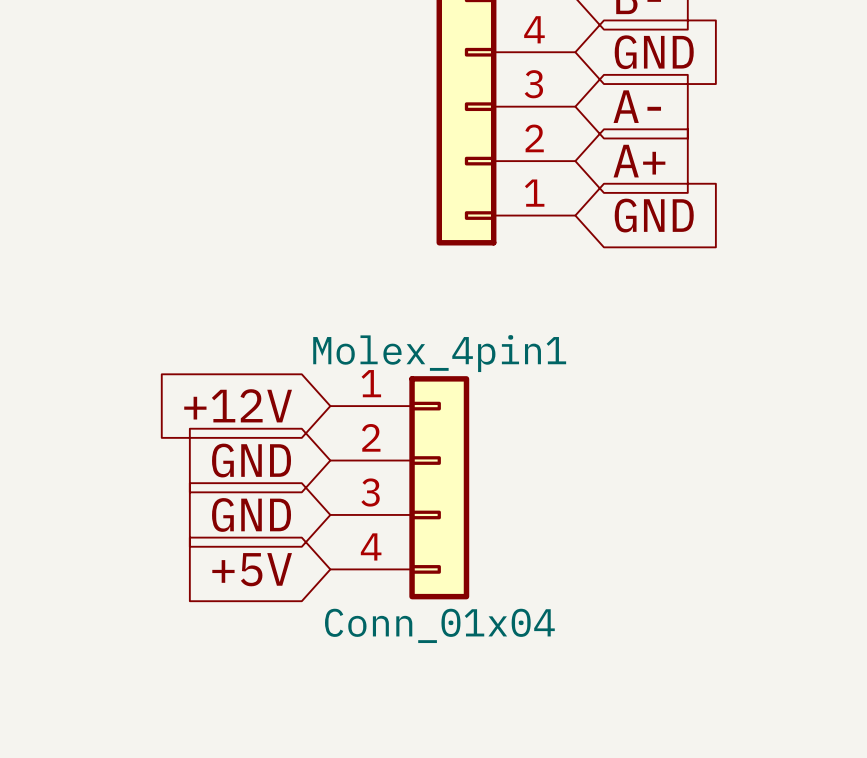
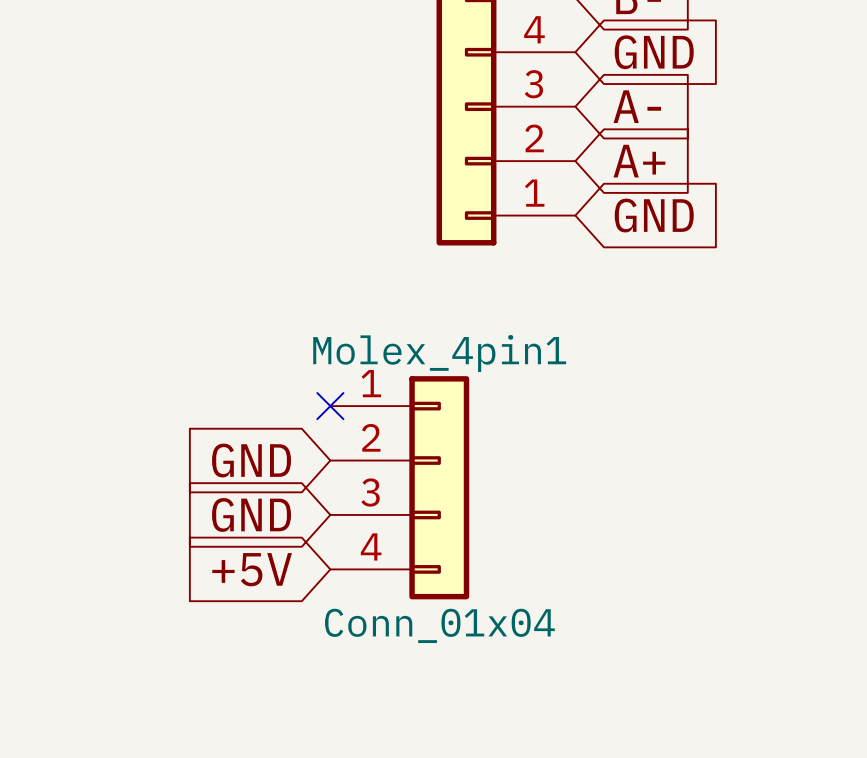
global label: +12V (238, 405) -> none
no-connect mark: none -> (330, 406)

